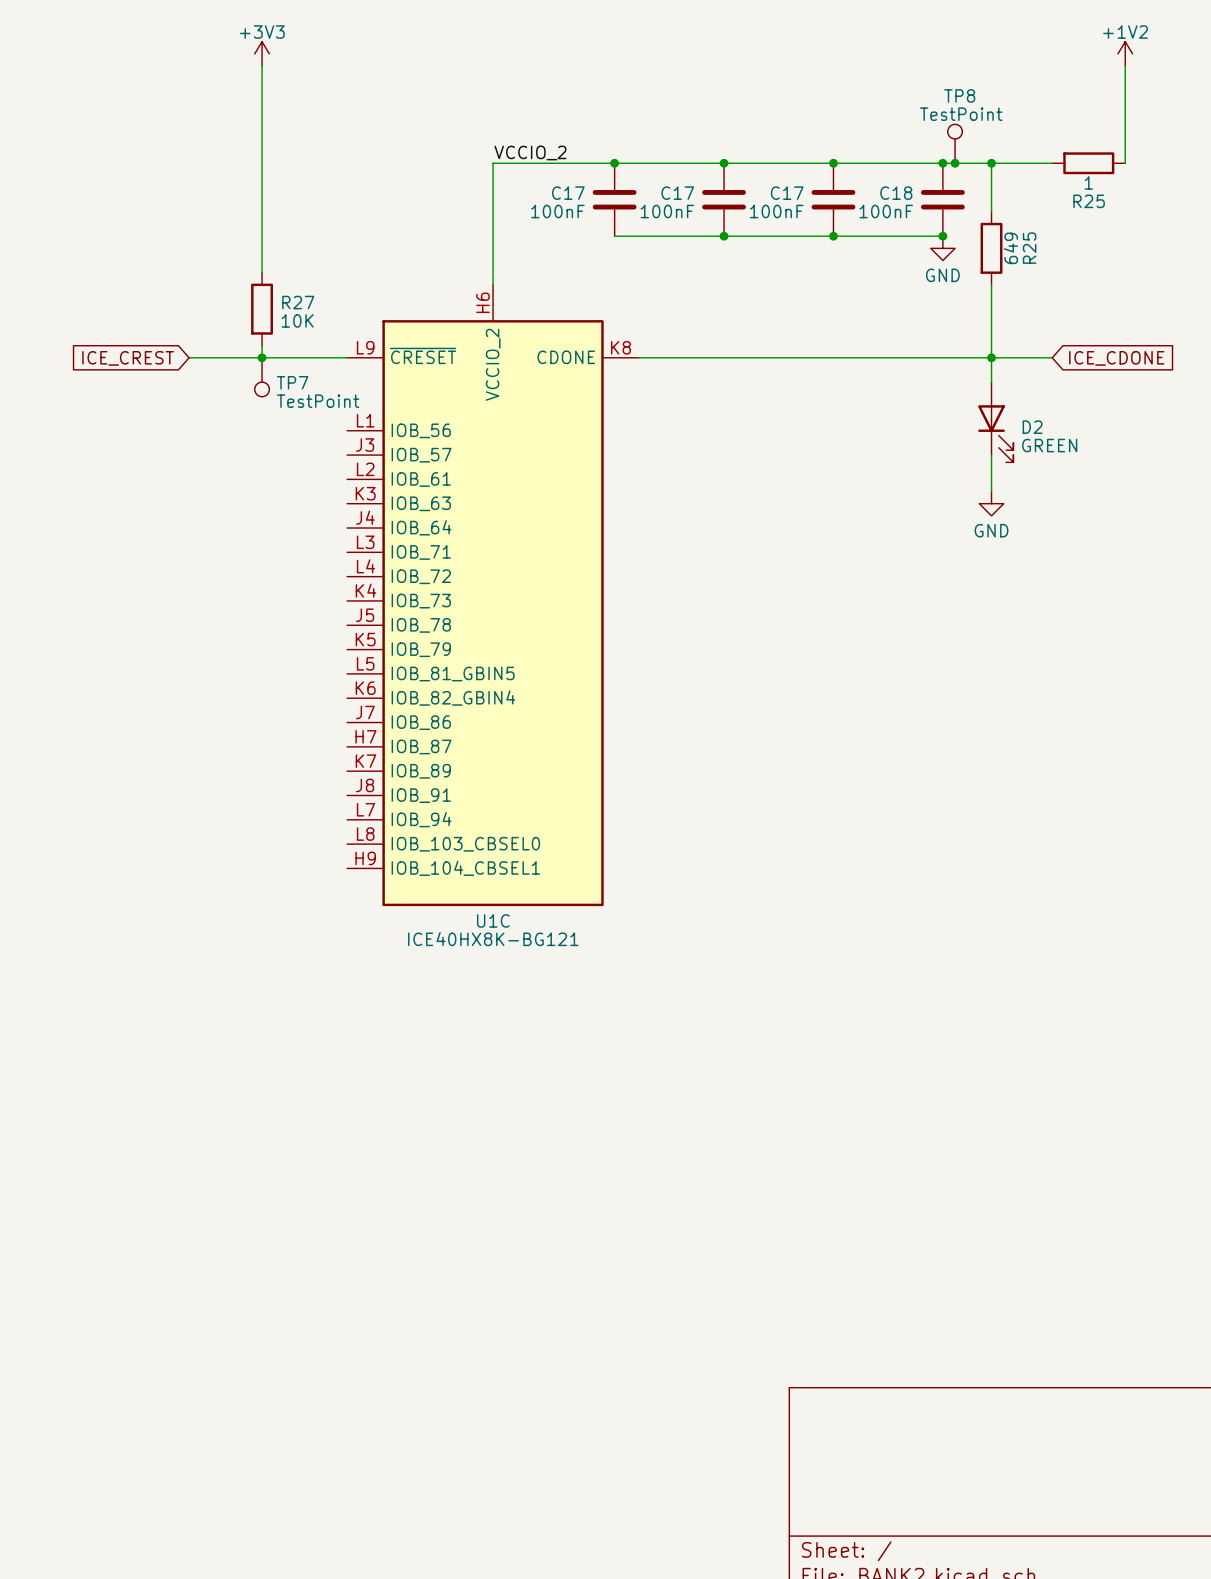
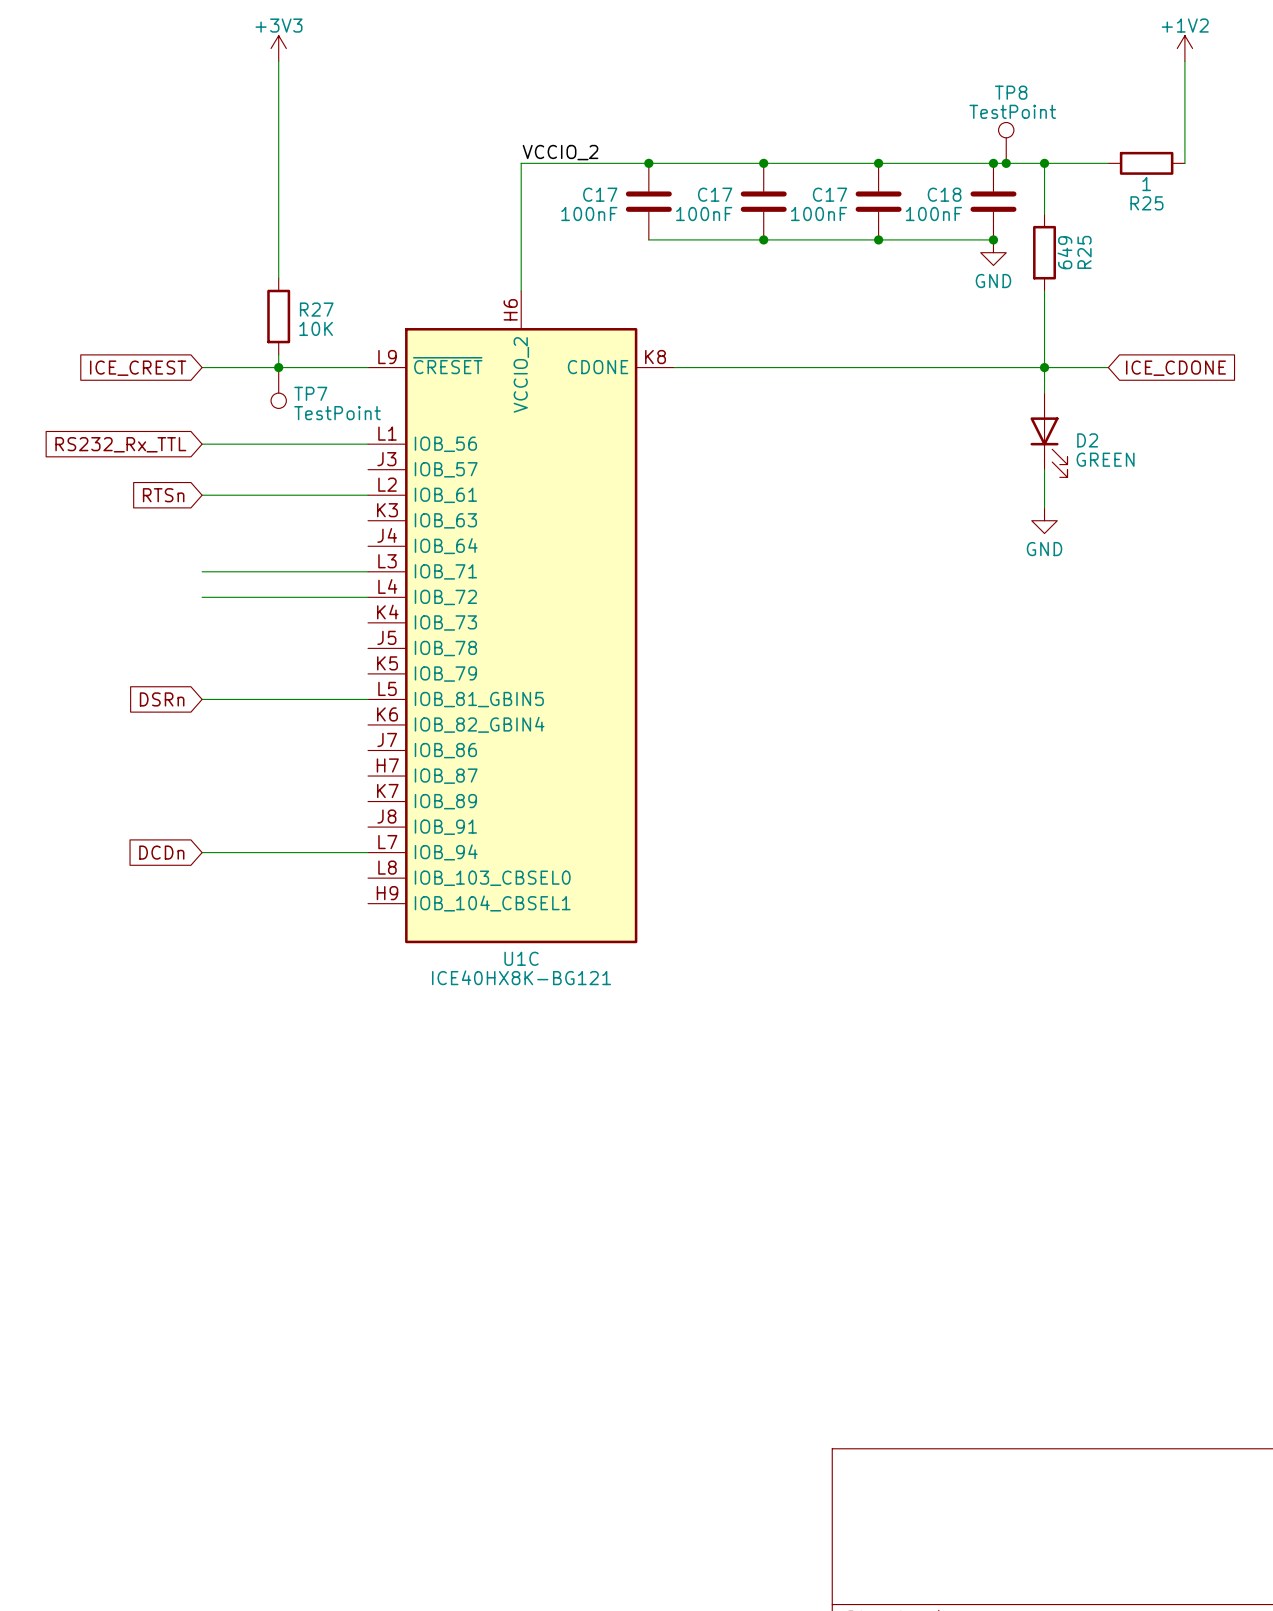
wire: none -> (202, 444) (368, 444)
global label: none -> RS232_Rx_TTL (120, 444)
global label: none -> RTSn (163, 495)
wire: none -> (202, 495) (368, 495)
wire: none -> (202, 571) (368, 571)
wire: none -> (202, 597) (368, 597)
global label: none -> DSRn (162, 699)
wire: none -> (202, 699) (368, 699)
global label: none -> DCDn (161, 852)
wire: none -> (202, 852) (368, 852)

